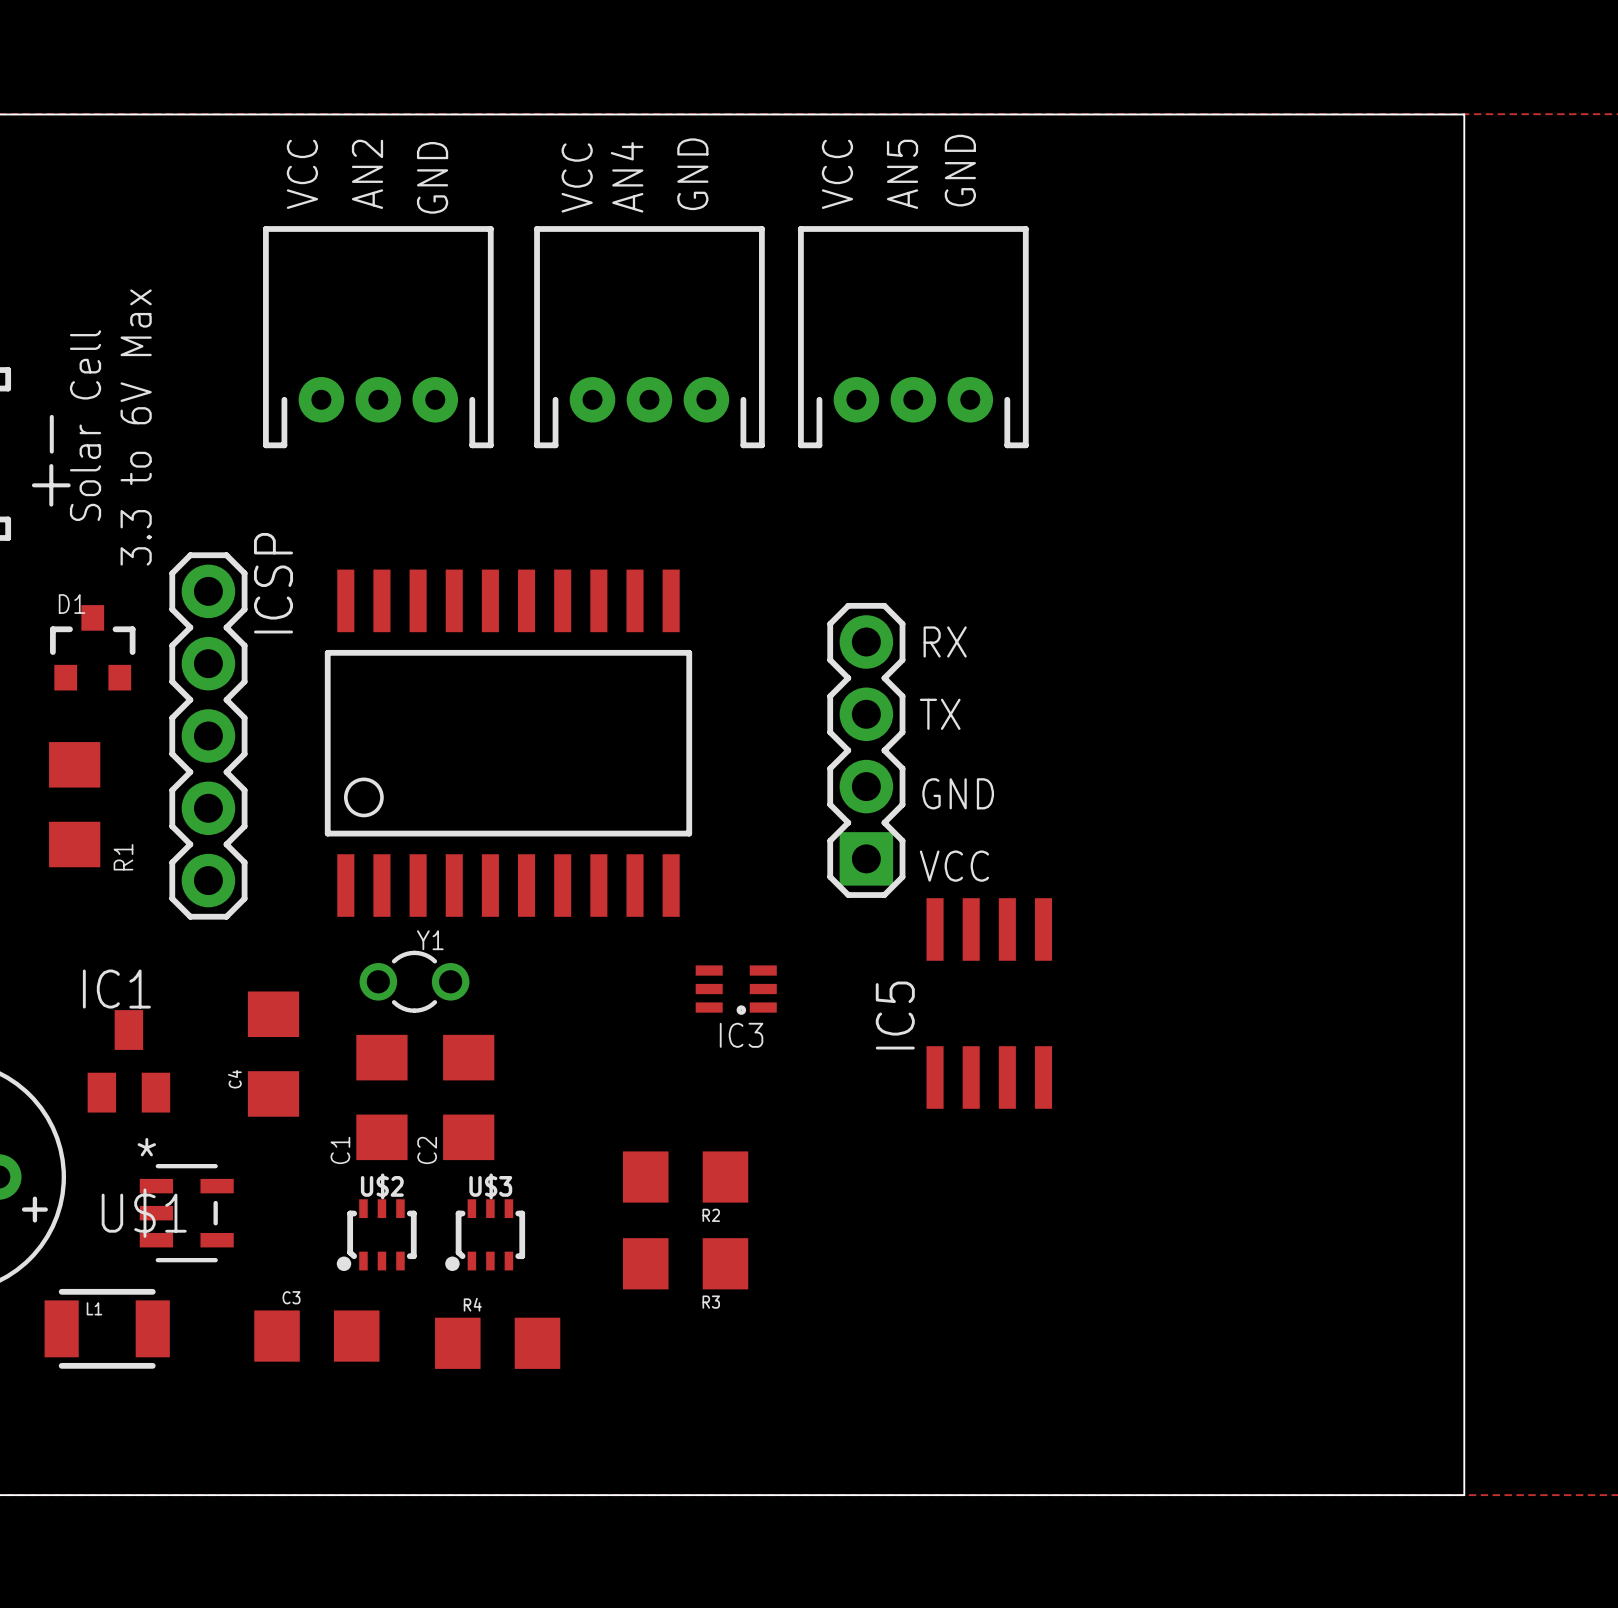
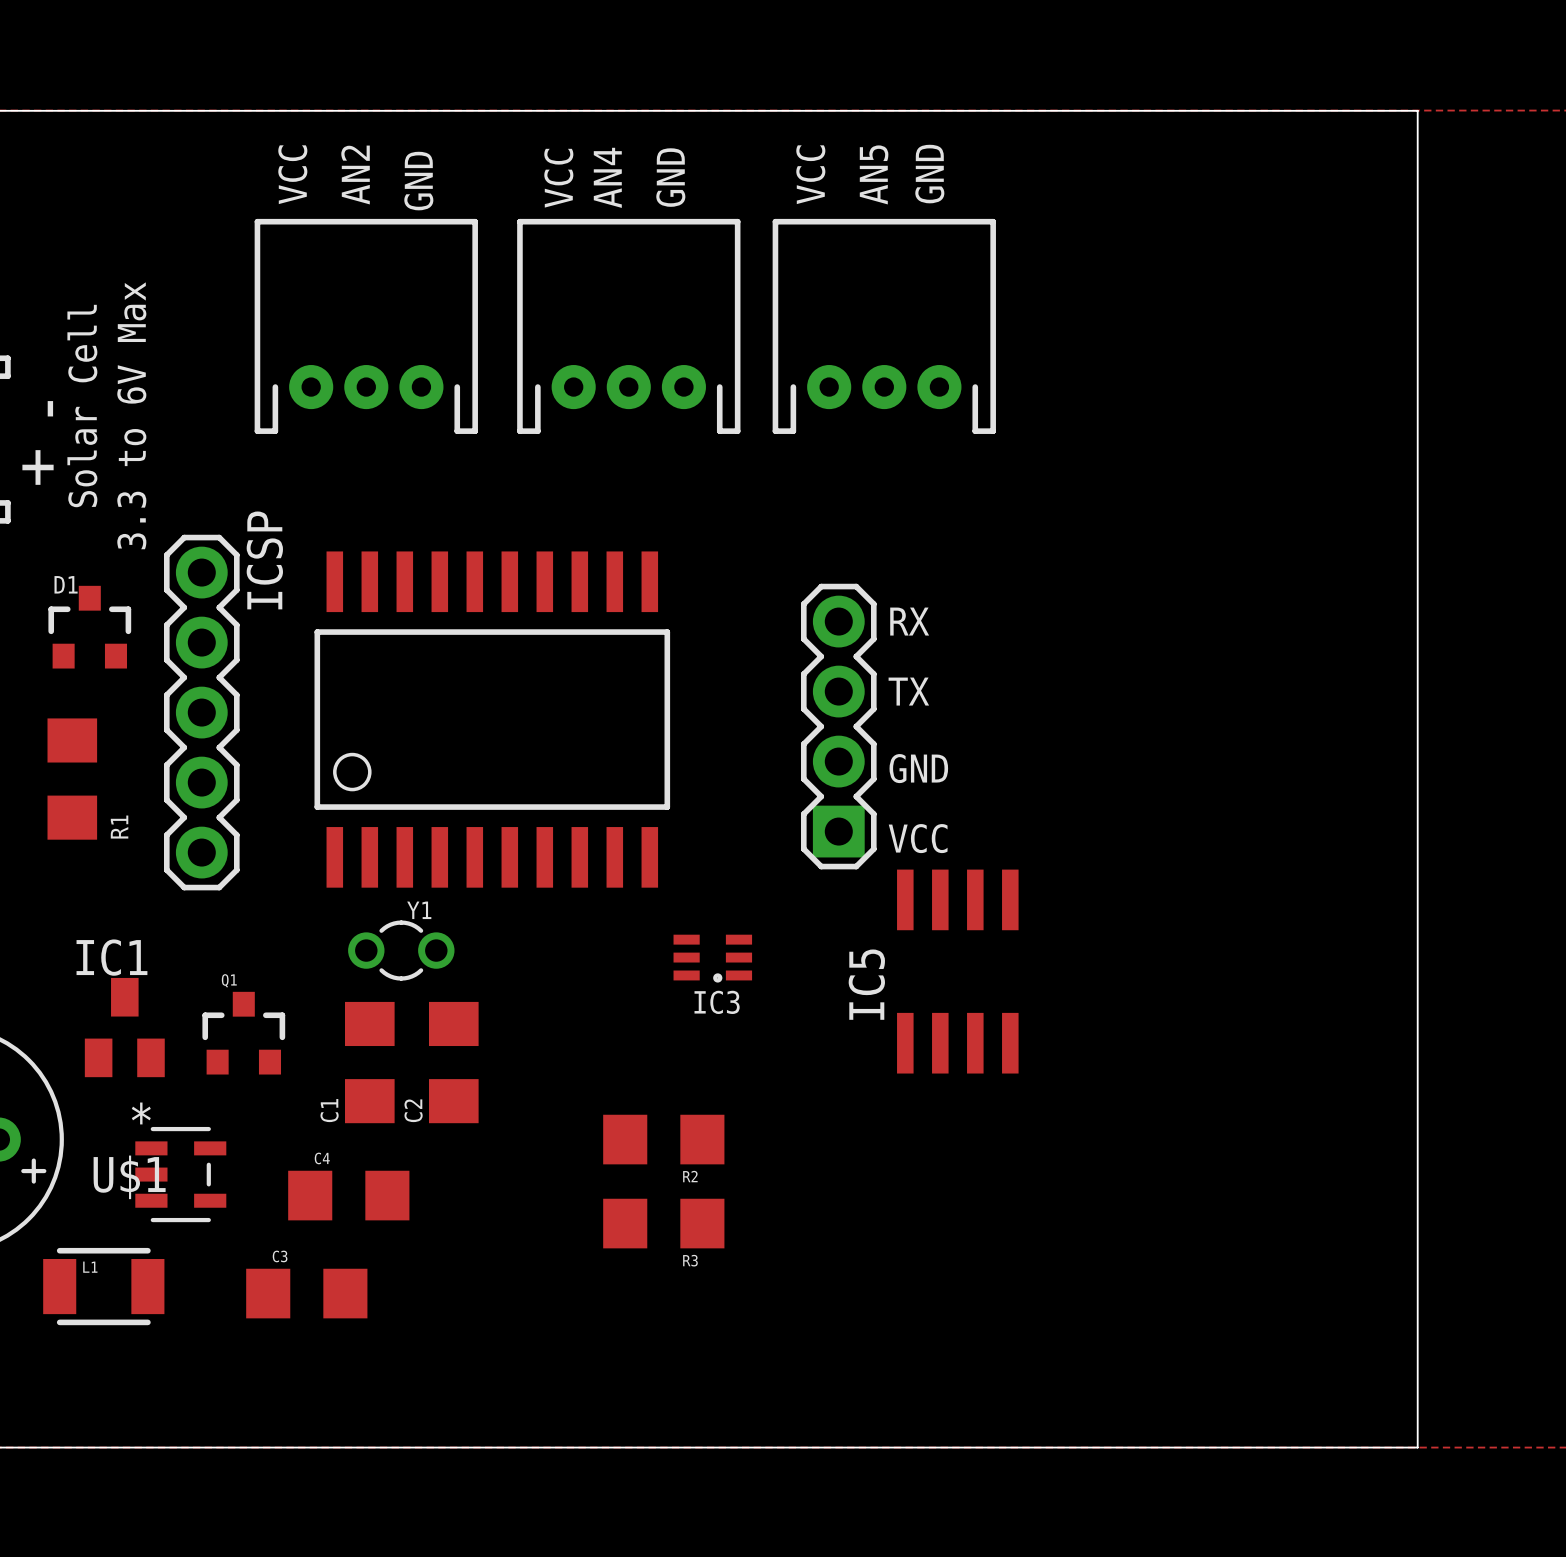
C4 rotation: 0° (273, 1054) -> 90° clockwise (348, 1195)
C4 position: (273, 1054) -> (348, 1195)
Q1: none -> (243, 1033)
U$2: (376, 1235) -> none
U$3: (485, 1235) -> none
R4: (497, 1343) -> none

